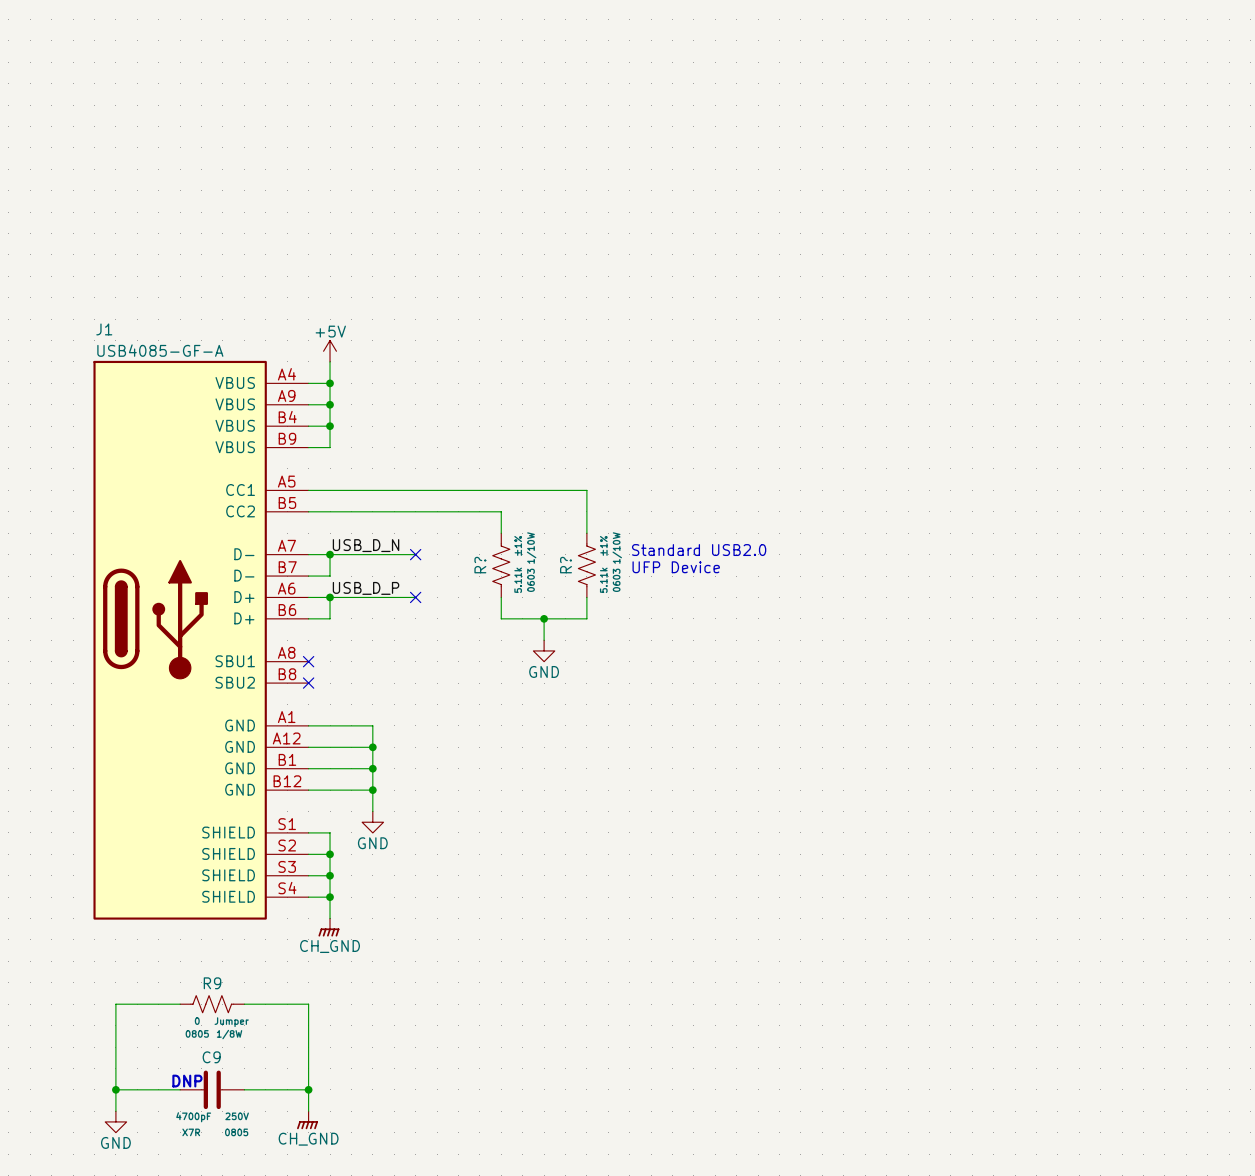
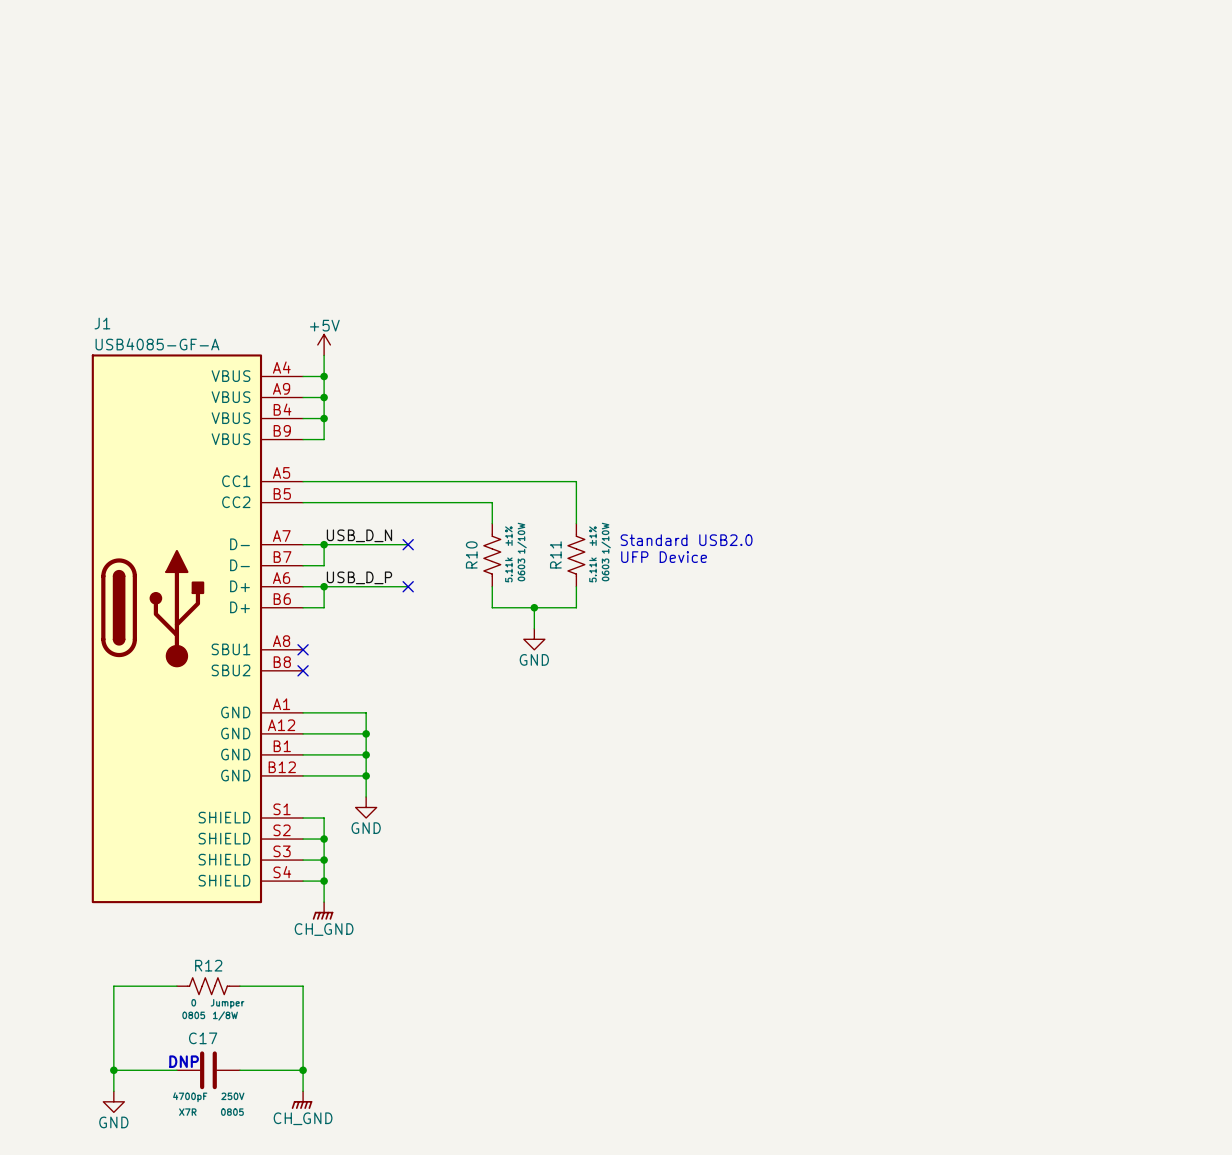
R? name: R? (480, 565) -> R10 (471, 554)
R? name: R? (566, 565) -> R11 (555, 554)
R9 name: R9 (212, 983) -> R12 (208, 965)
C9 name: C9 (211, 1057) -> C17 (203, 1038)

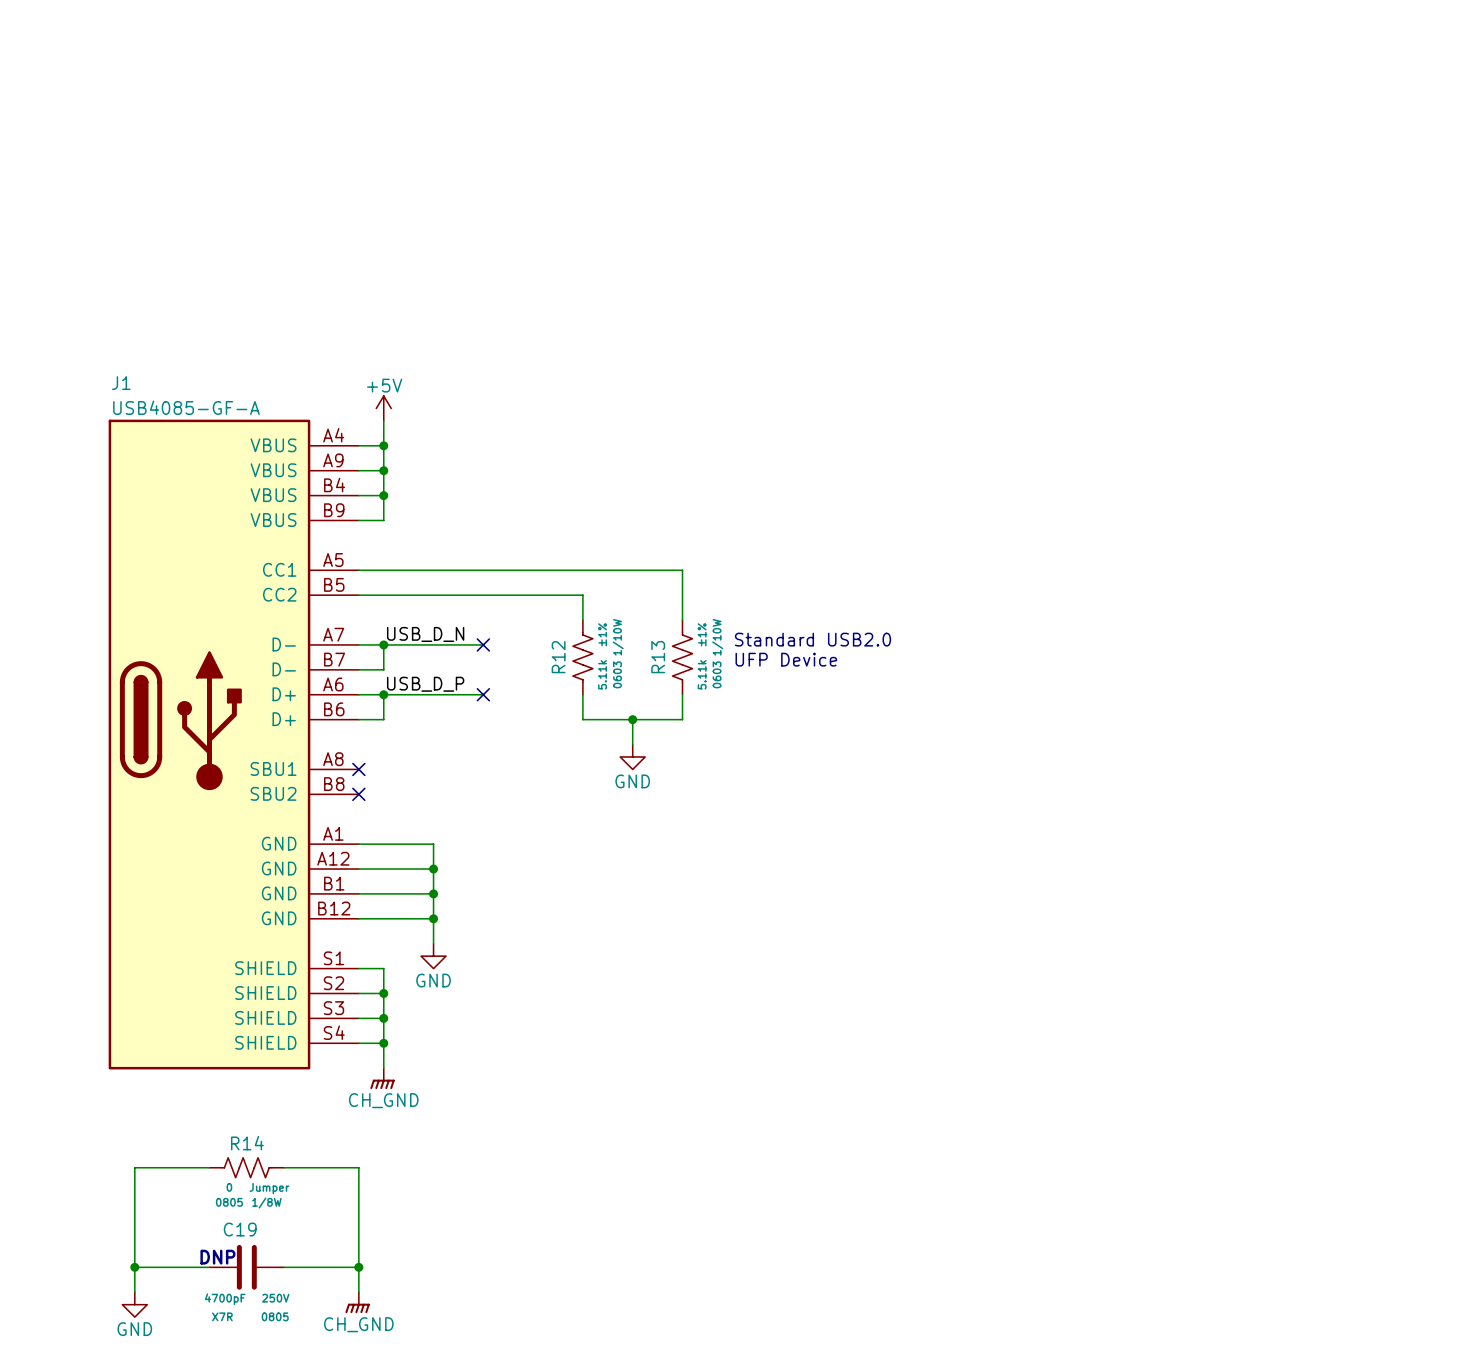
R10 name: R10 (471, 554) -> R12 (558, 657)
R11 name: R11 (555, 554) -> R13 (658, 657)
R12 name: R12 (208, 965) -> R14 (247, 1143)
C17 name: C17 (203, 1038) -> C19 (240, 1229)

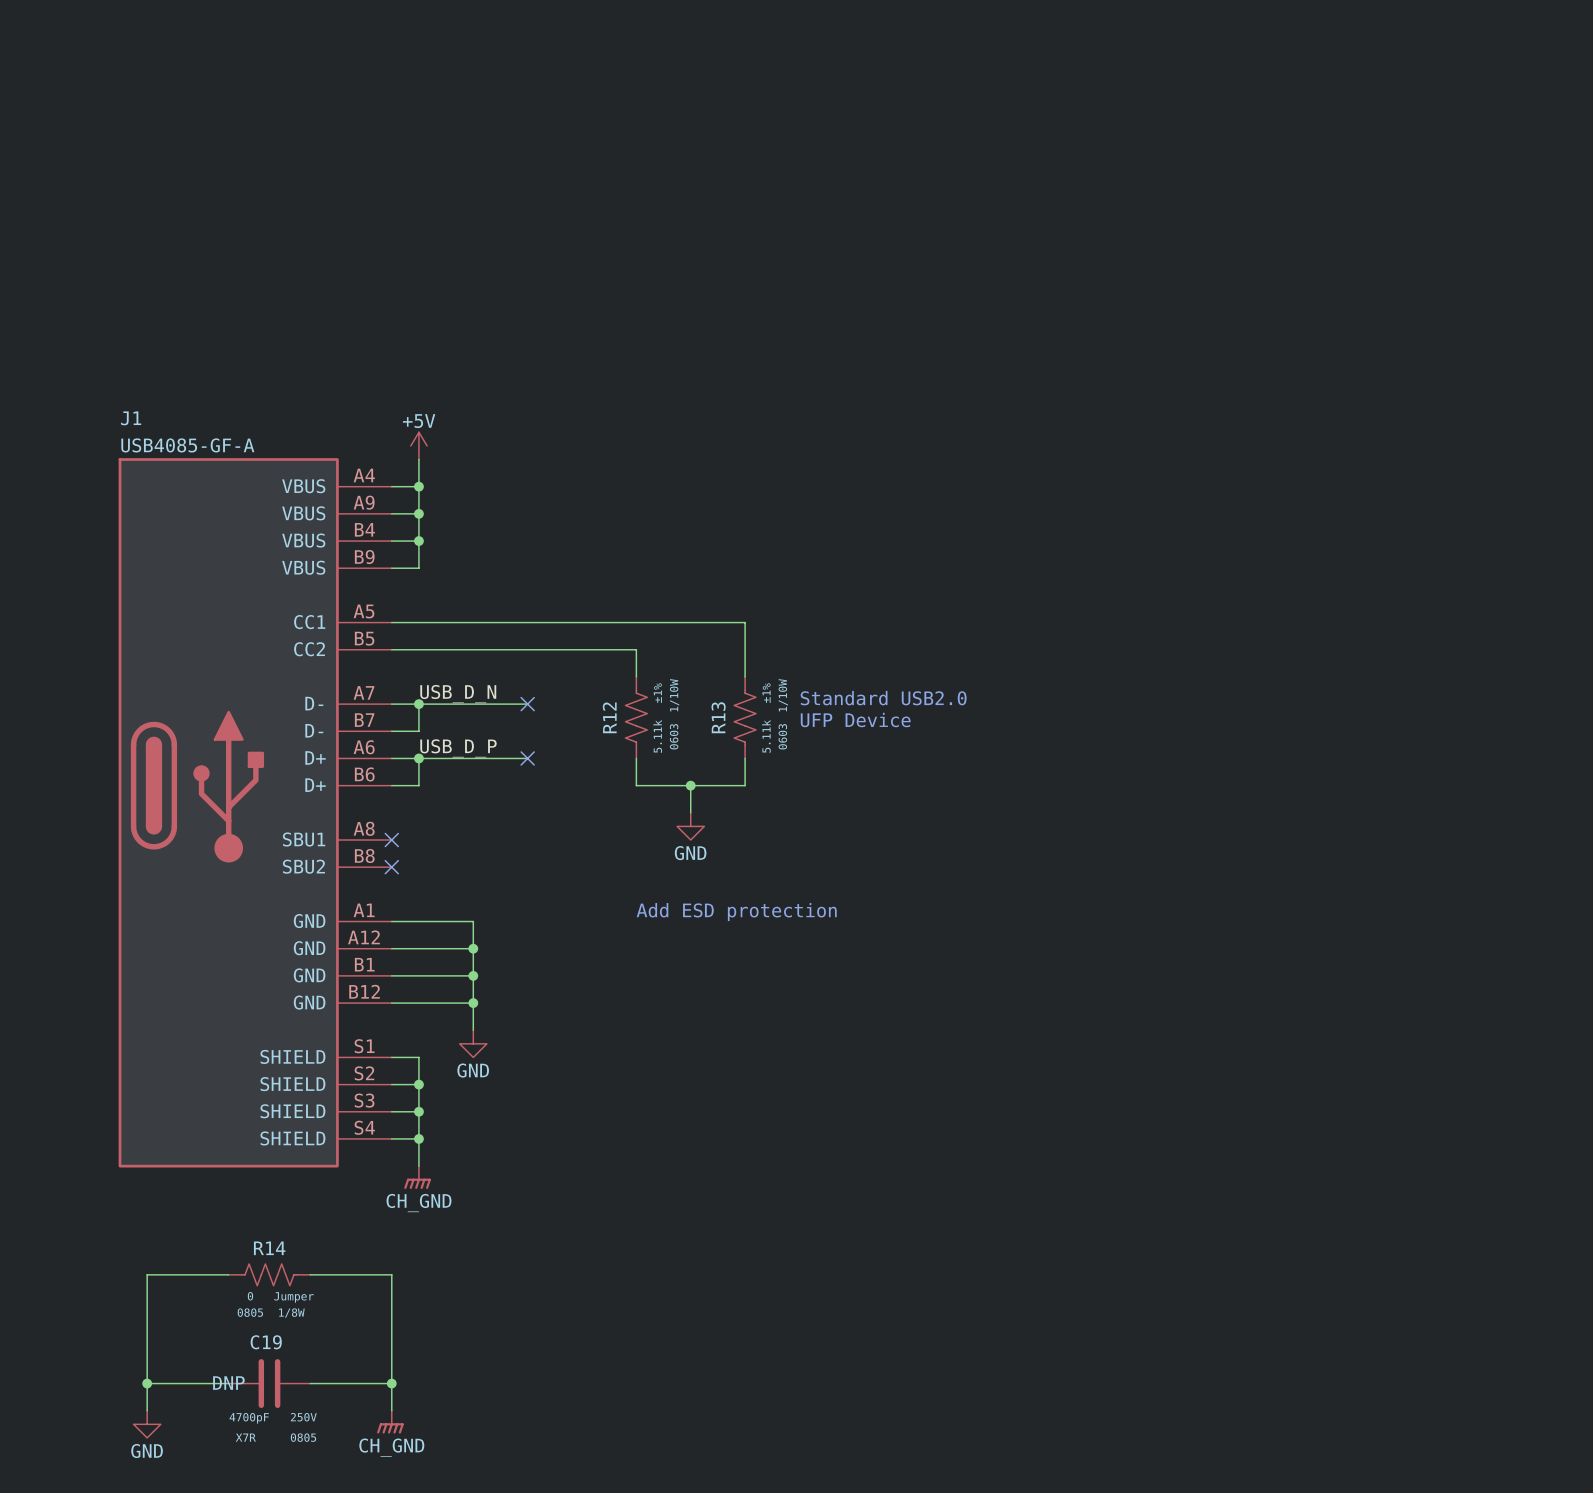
text: none -> Add ESD protection (736, 912)
text: DNP (217, 1257) -> none
C19 text: none -> DNP (228, 1383)

